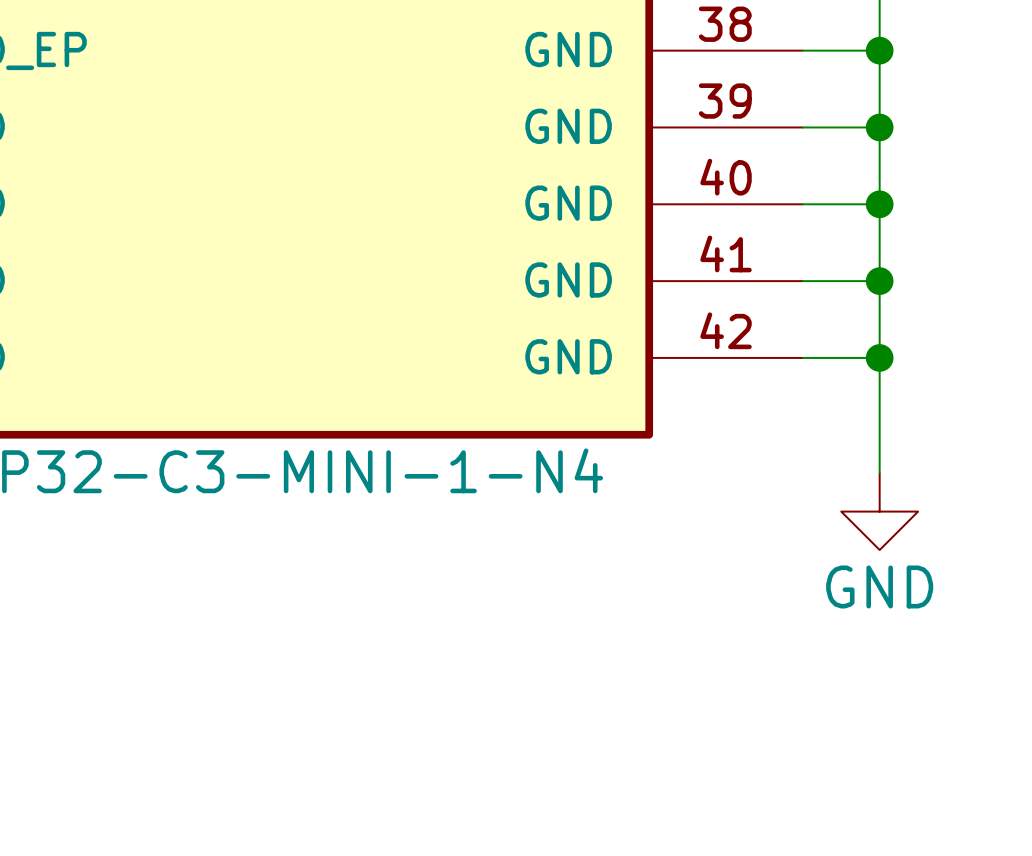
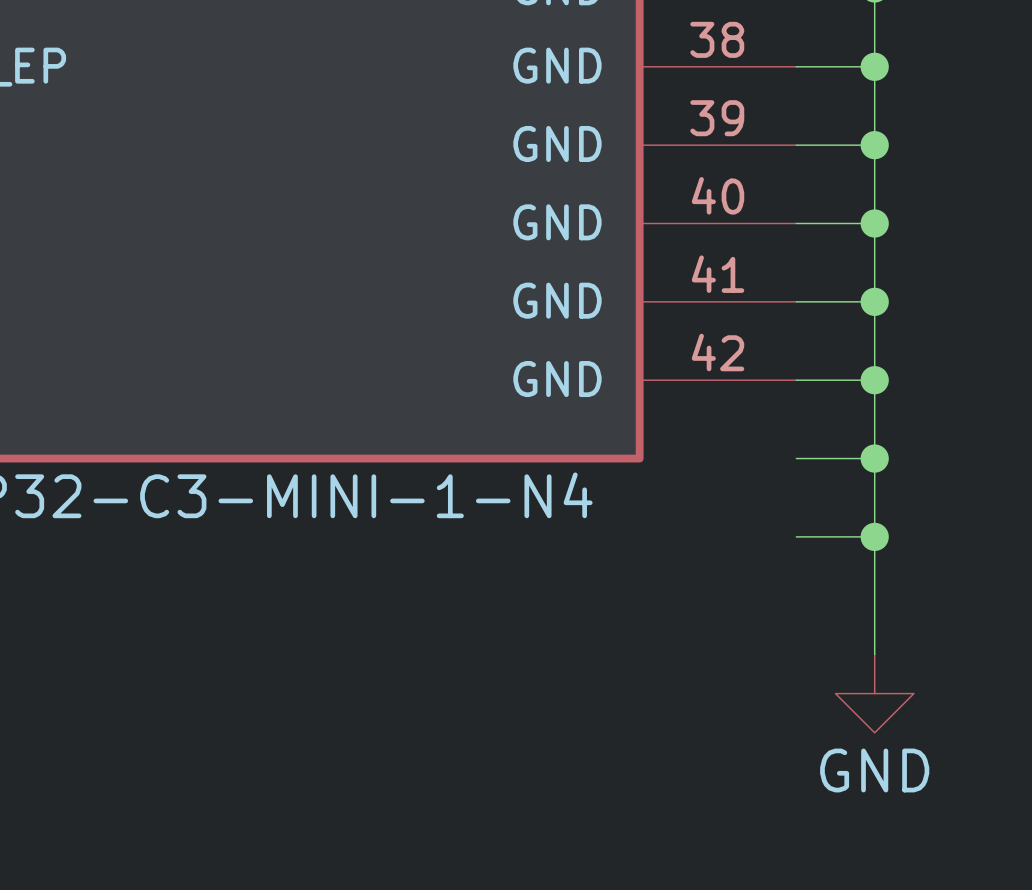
wire: none -> (796, 458) (874, 458)
junction: none -> (874, 458)
wire: none -> (874, 497) (874, 654)
wire: none -> (796, 536) (874, 536)
junction: none -> (874, 536)
power symbol position: GND (879, 511) -> GND (874, 693)

